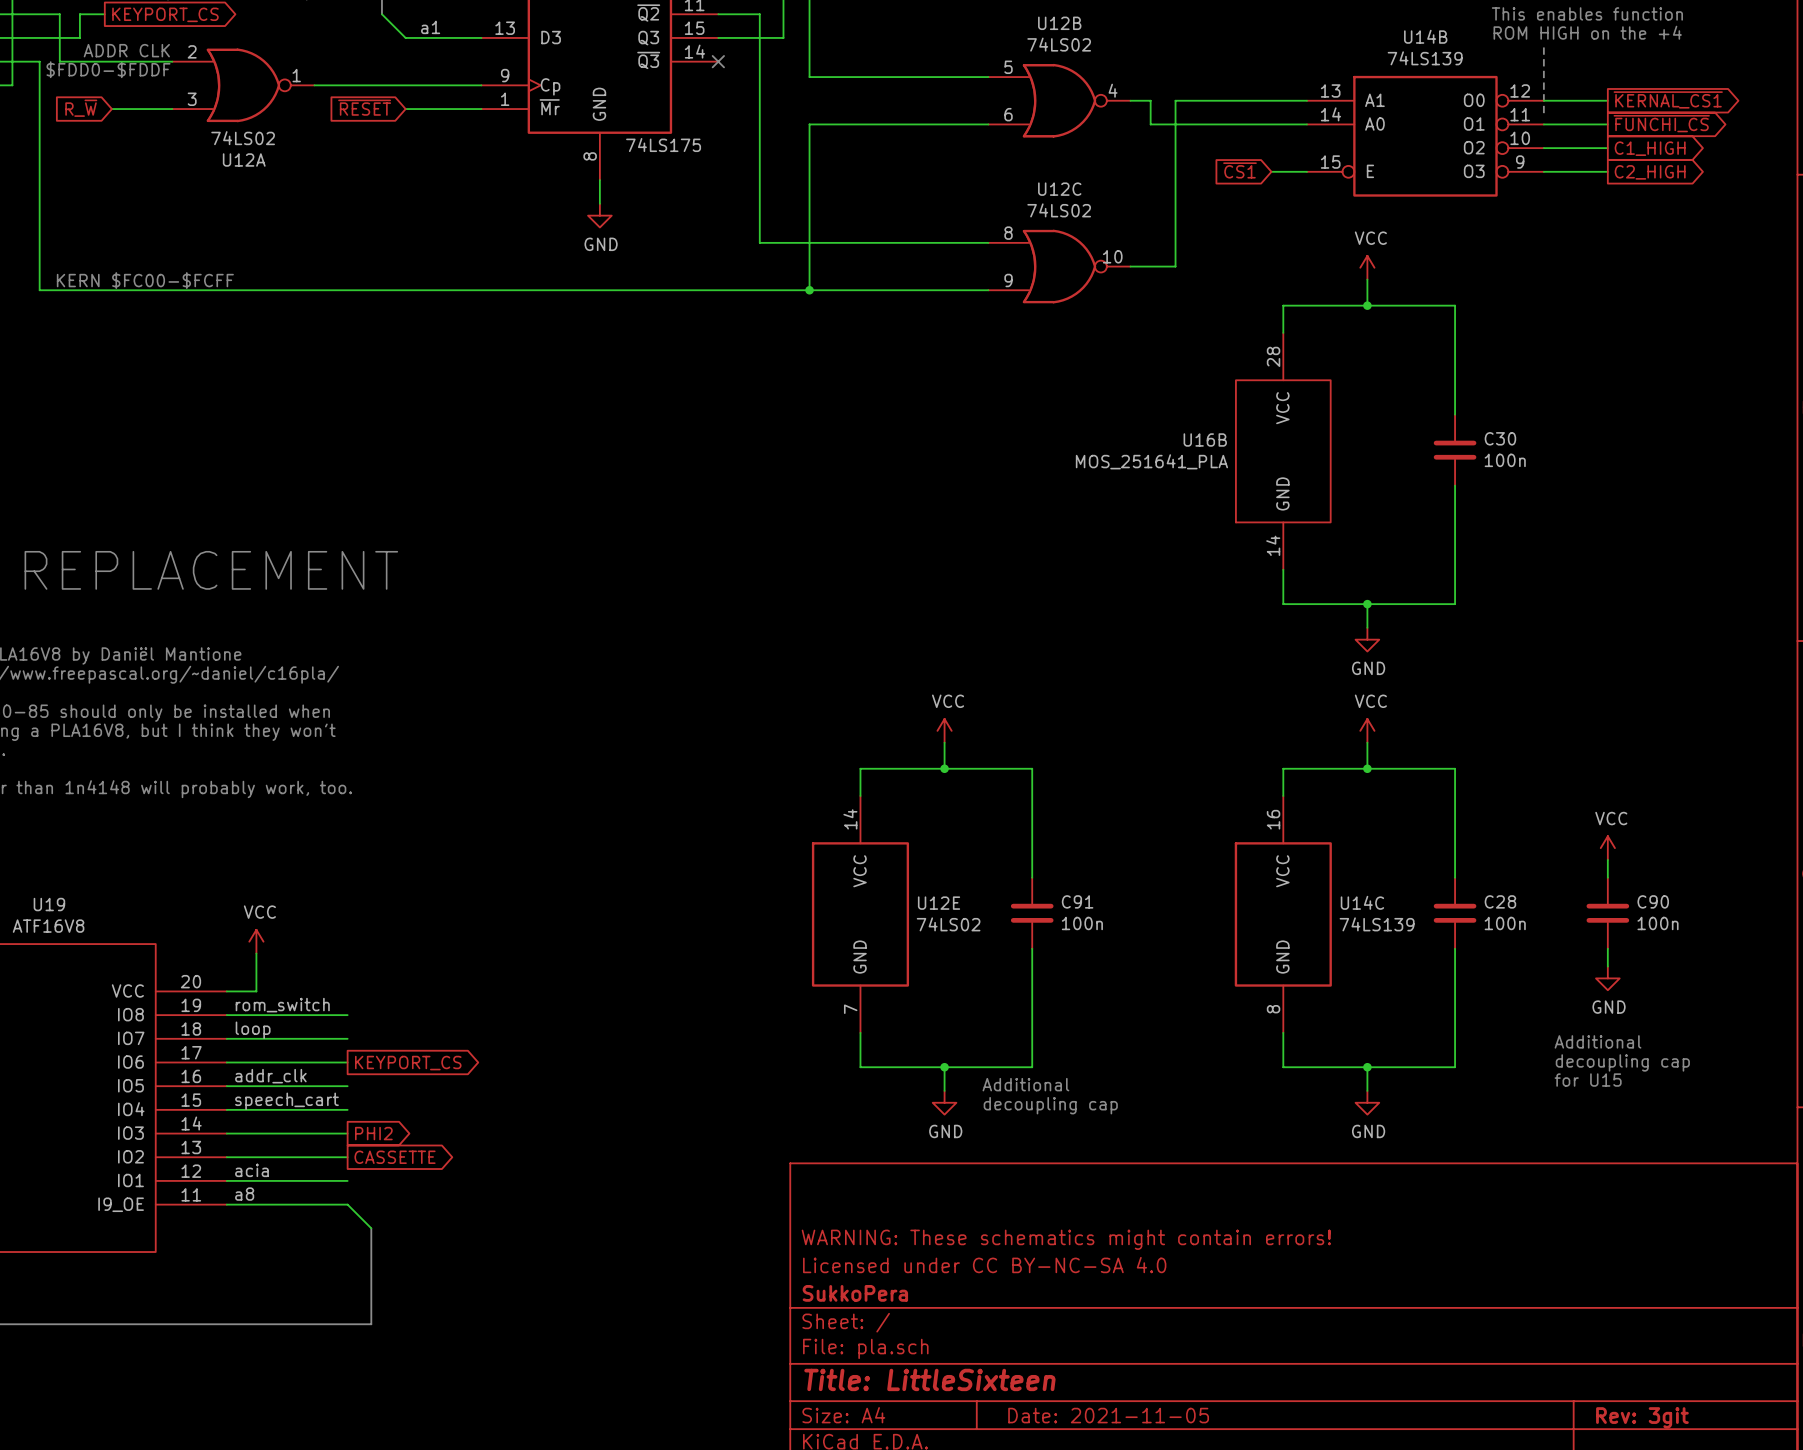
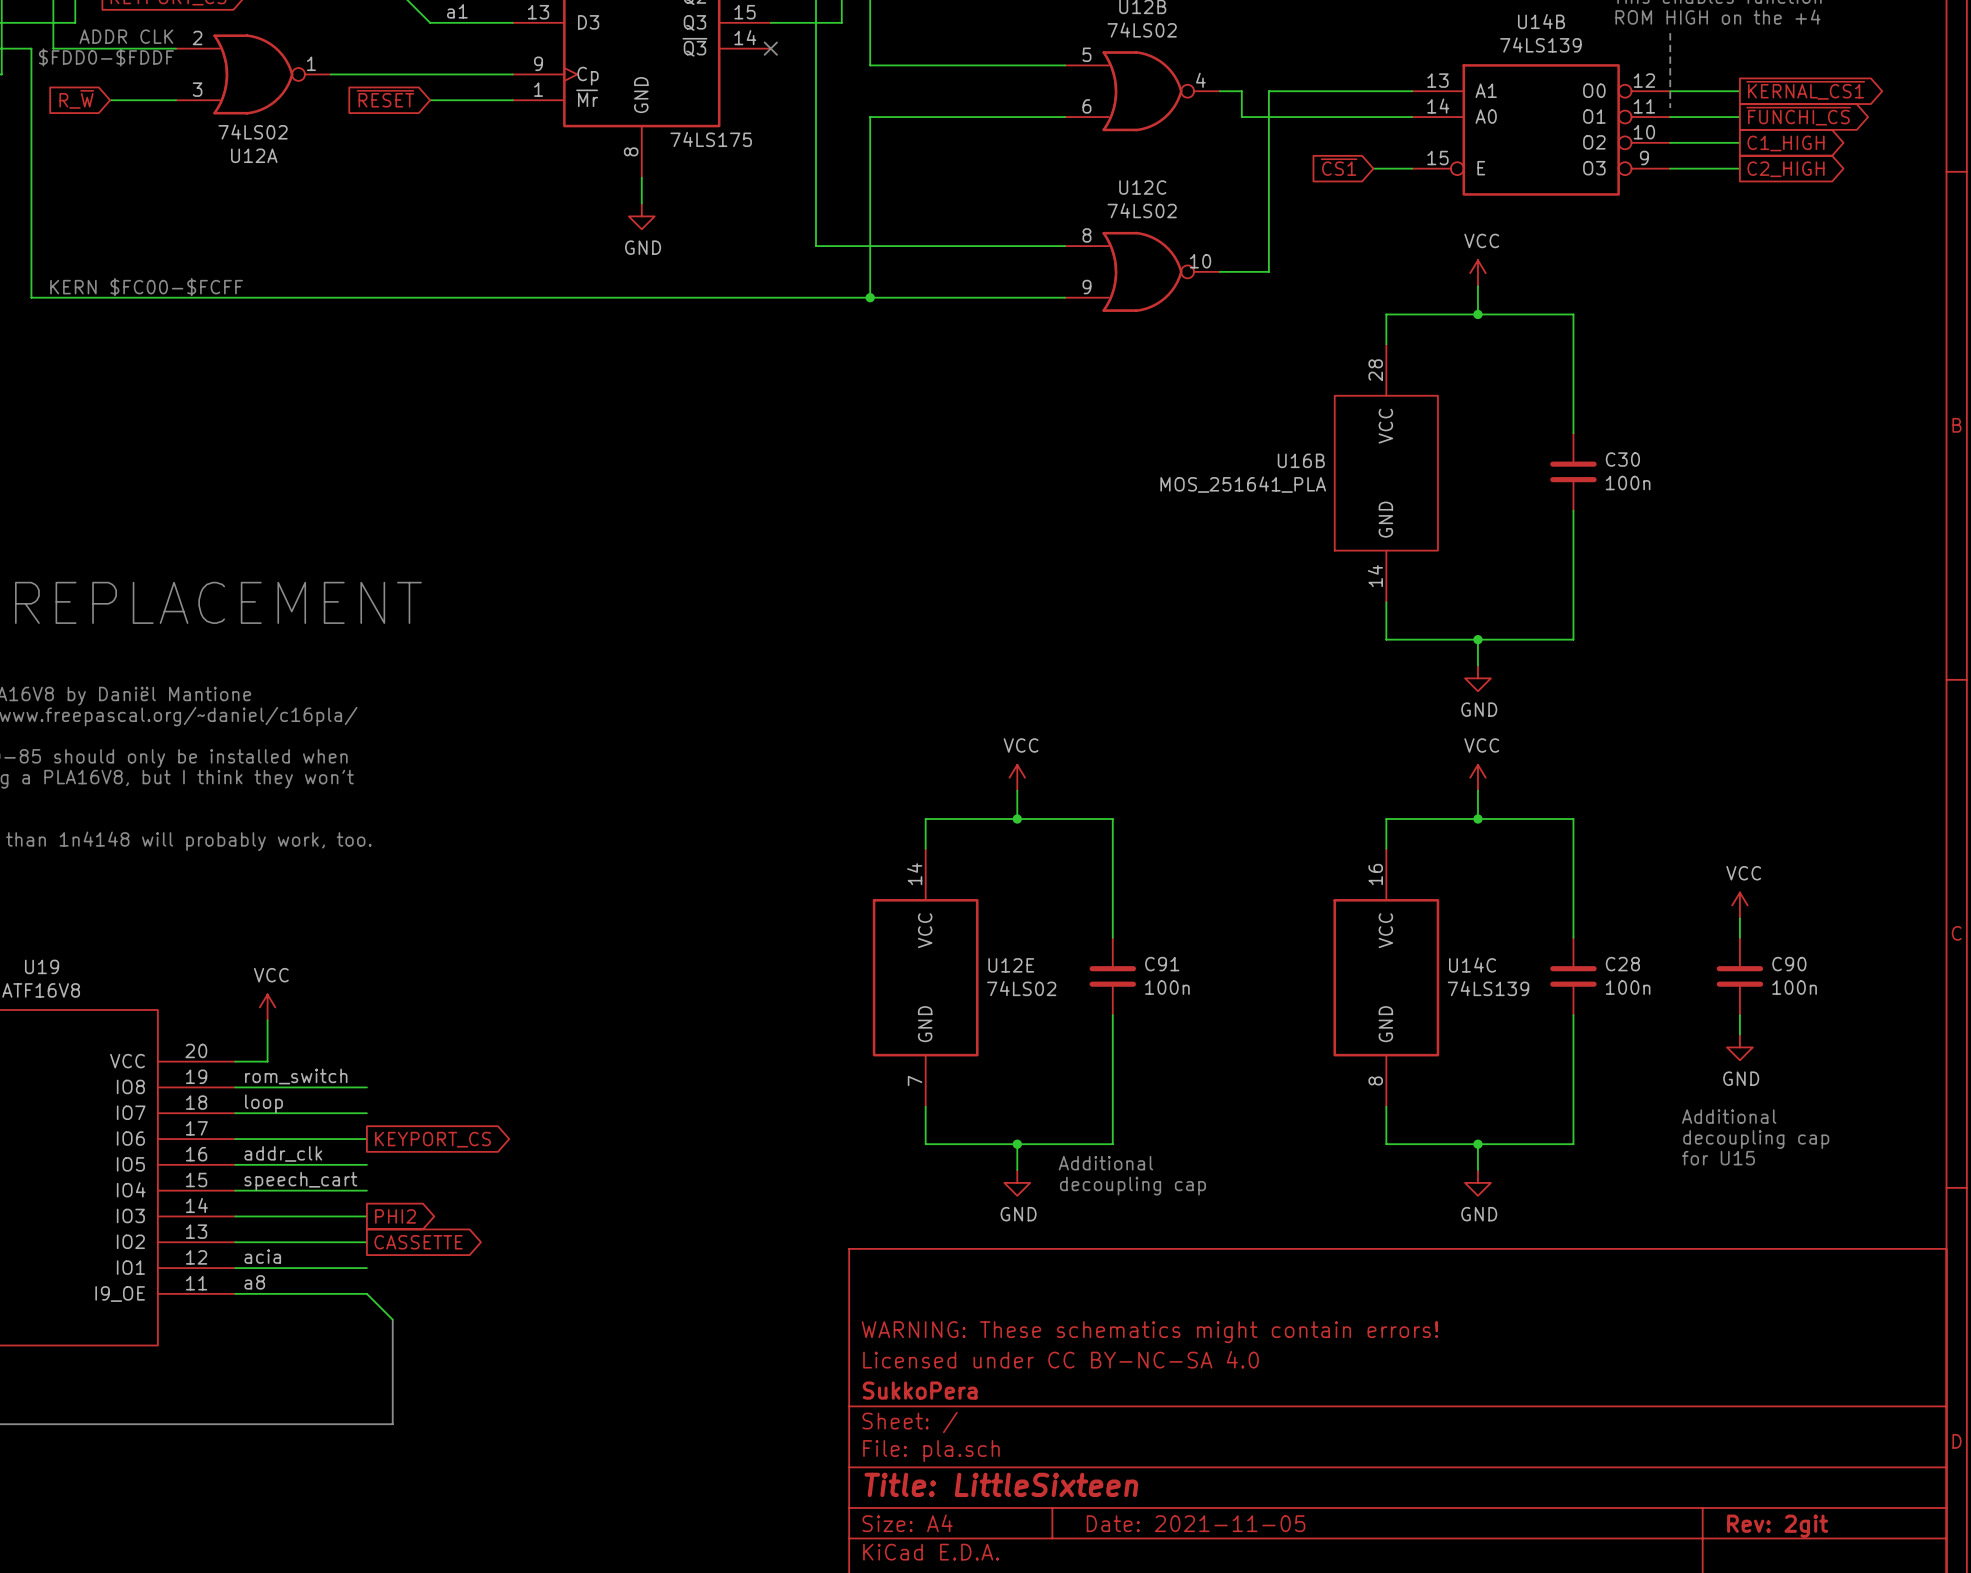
title block: Rev: 3git (1642, 1417) -> Rev: 2git (1777, 1526)

